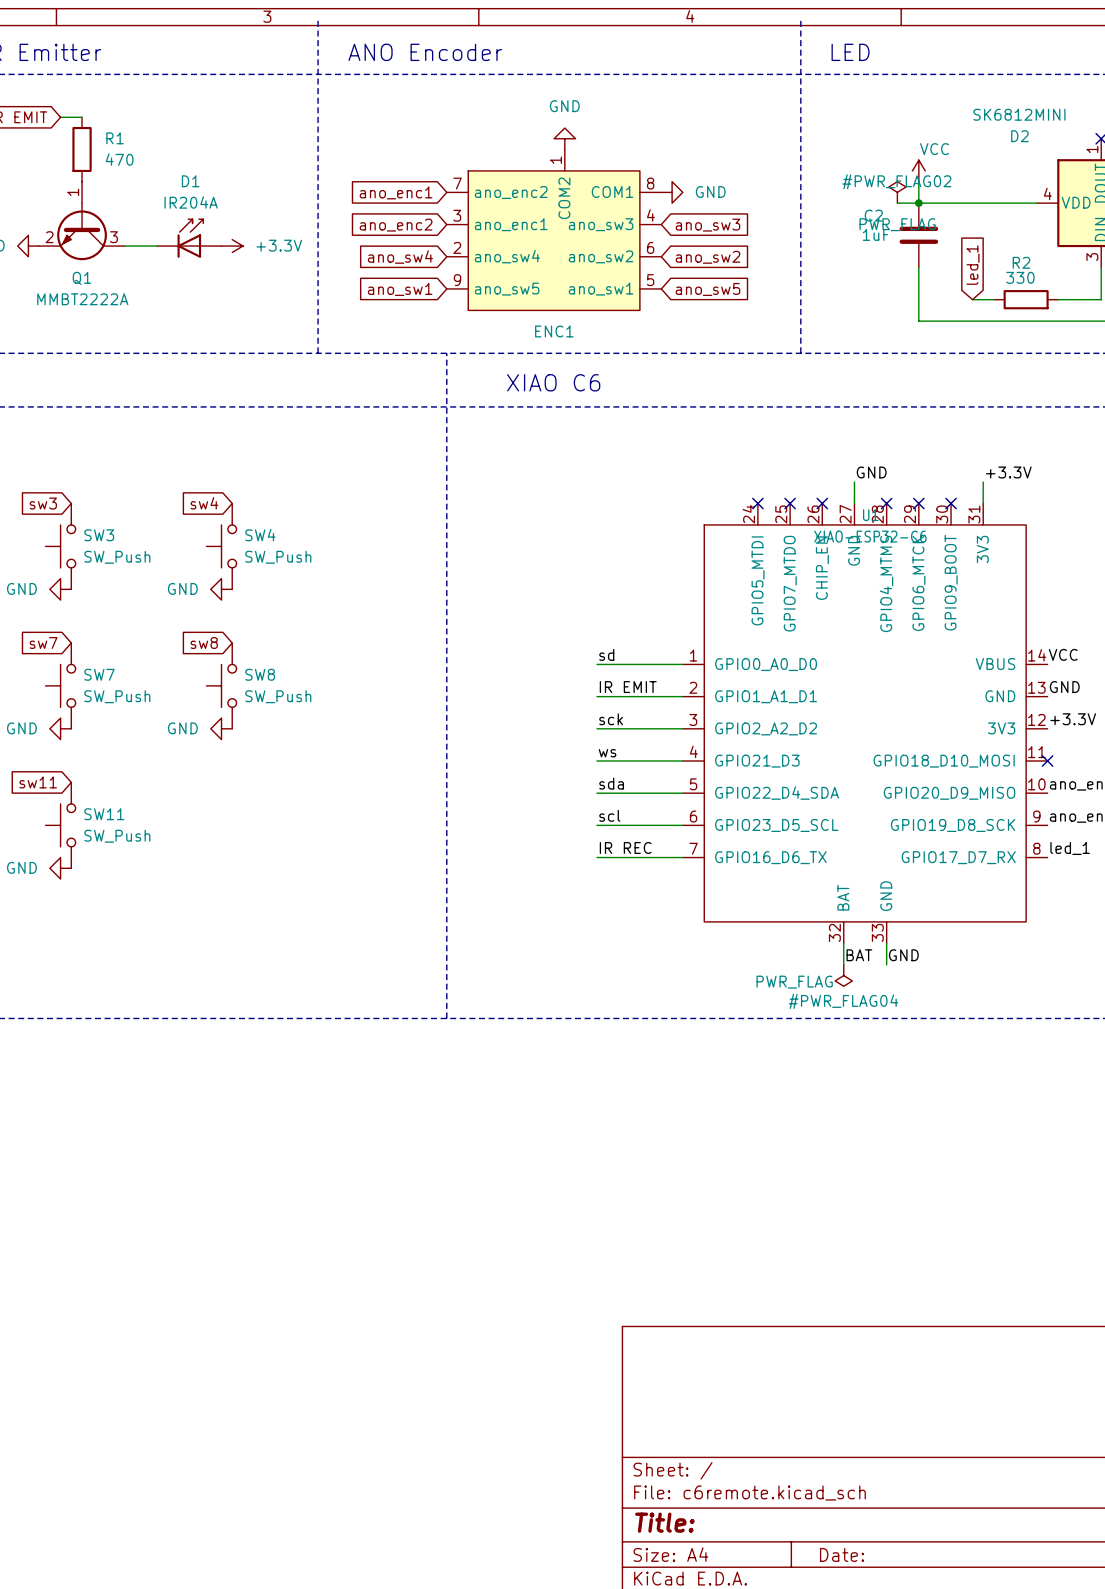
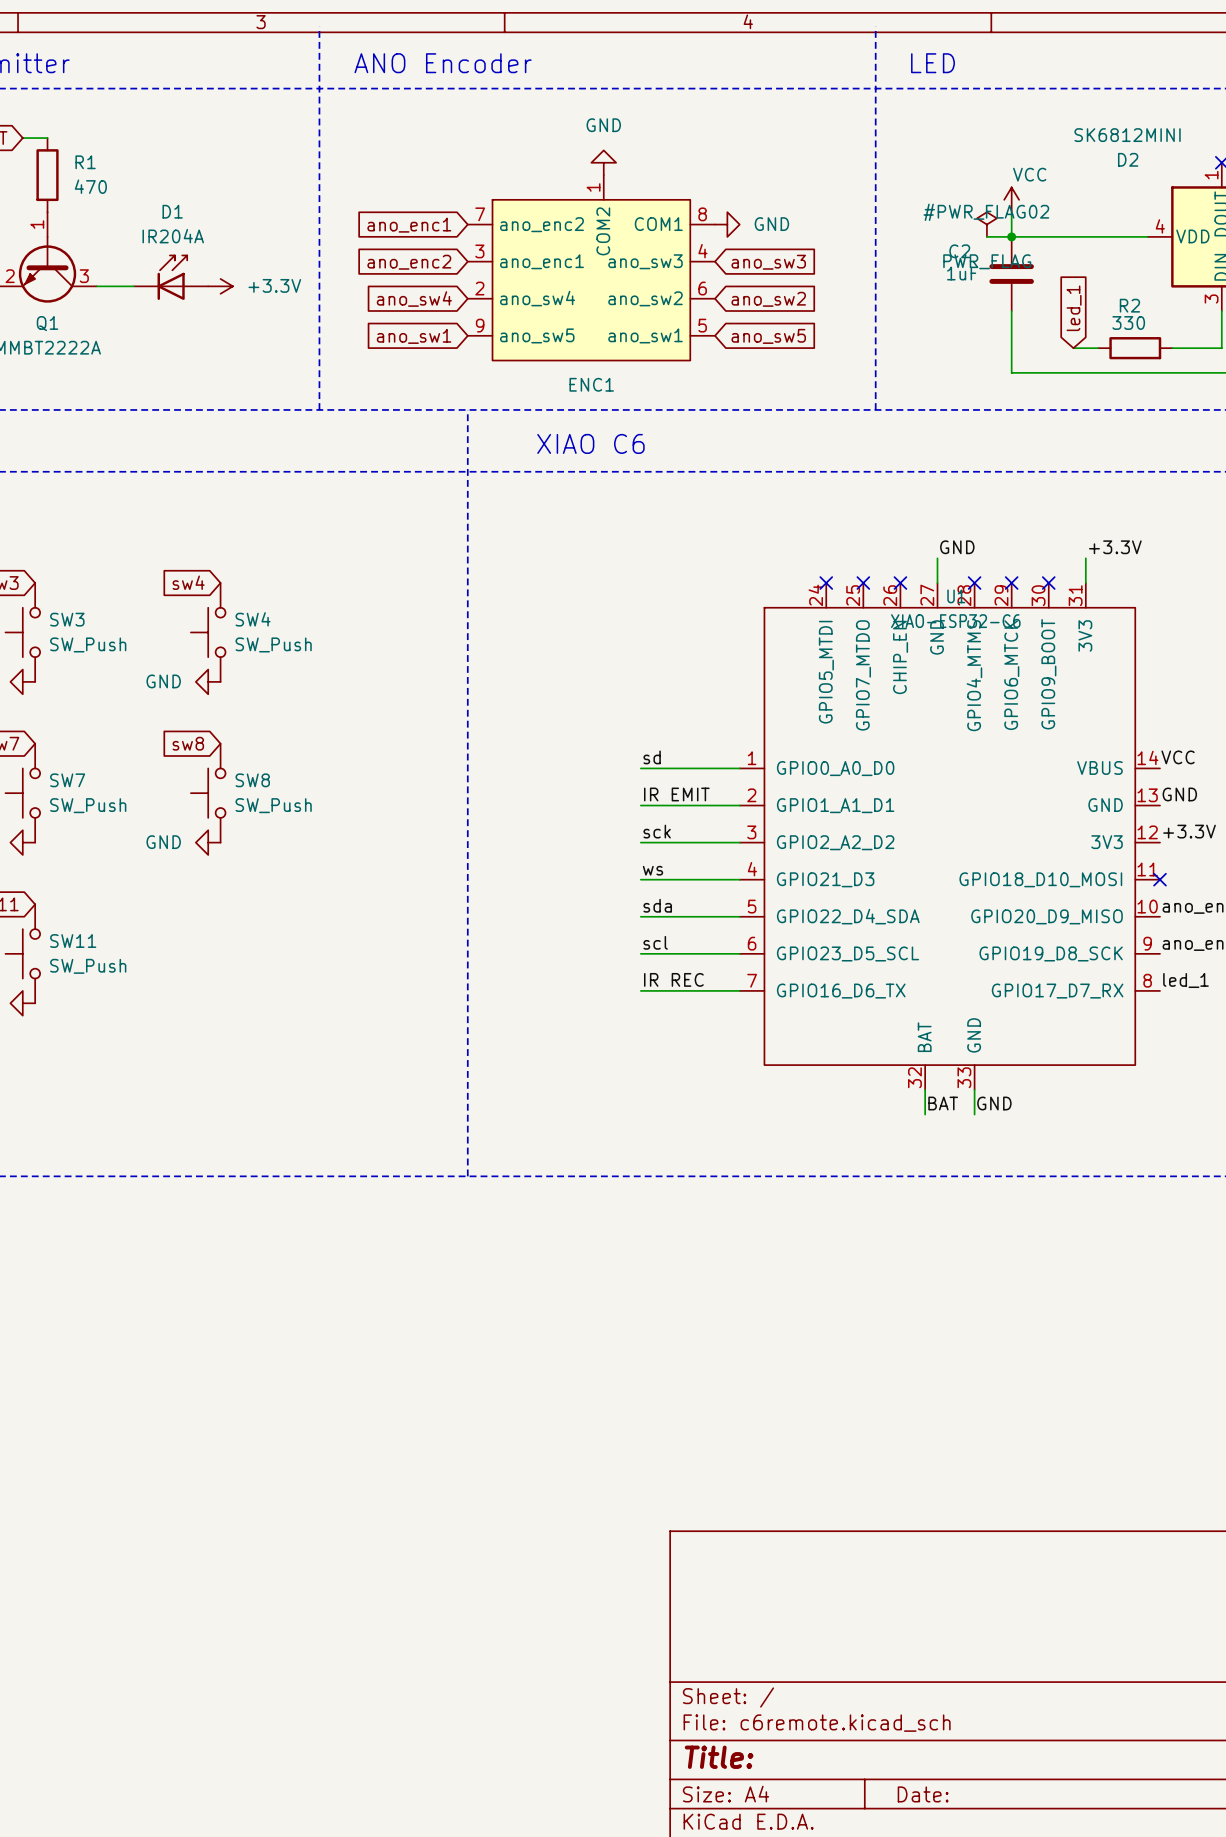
#PWR_FLAG04: PWR_FLAG (843, 975) -> none

